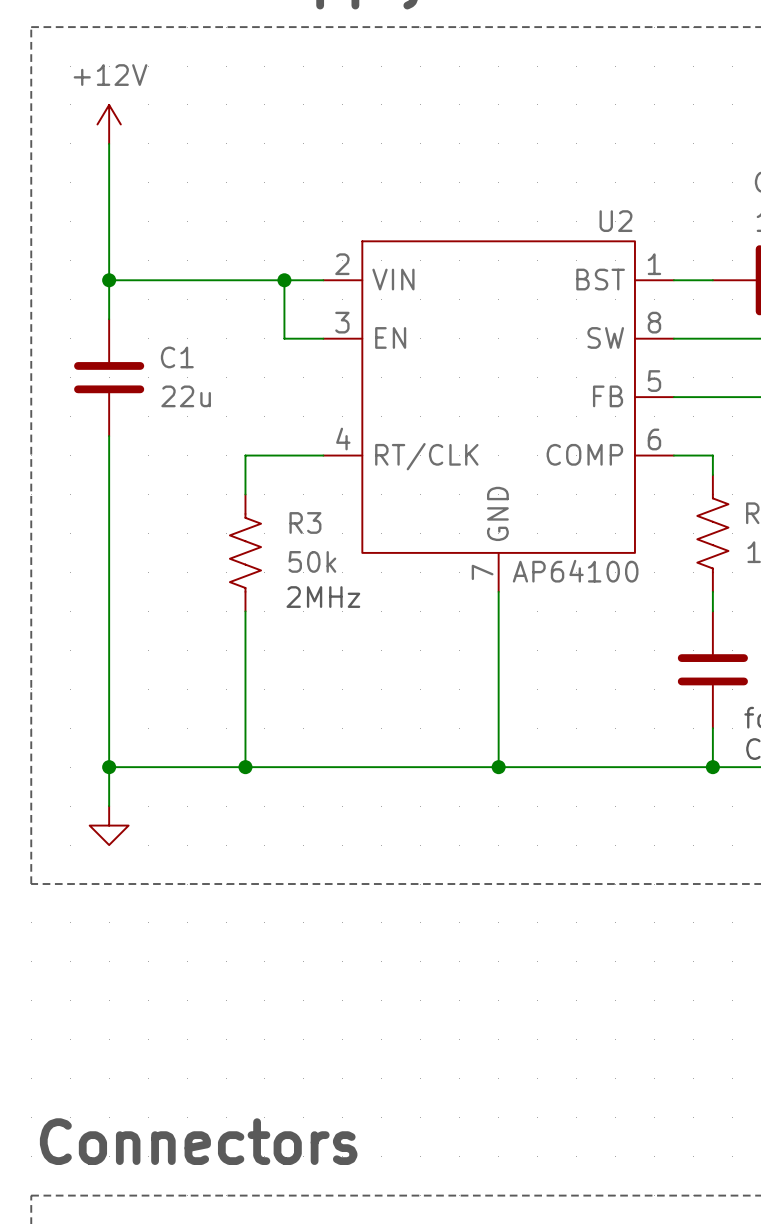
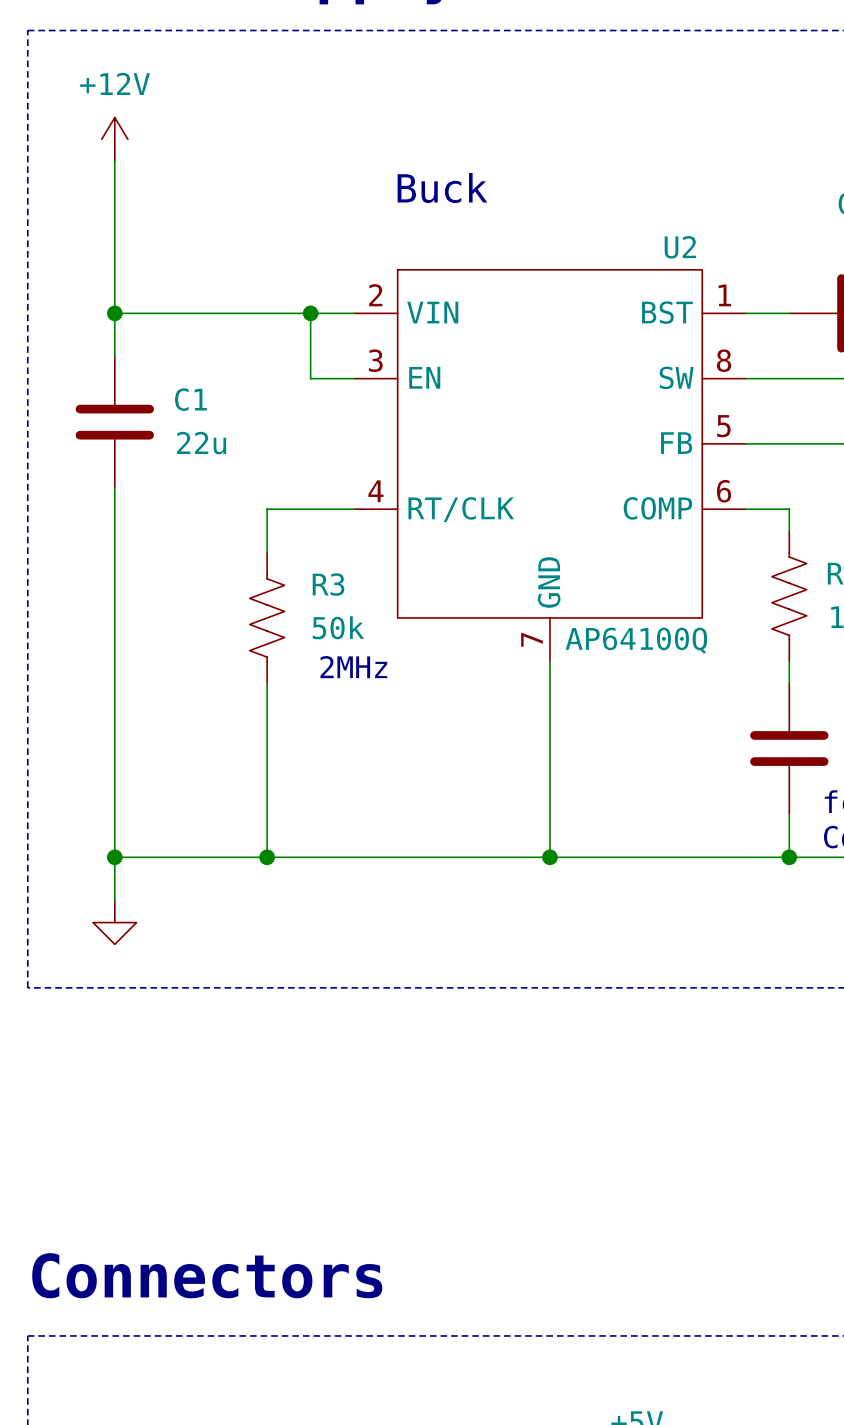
text: none -> Buck (442, 188)
U2 value: AP64100 (575, 571) -> AP64100Q (636, 640)

